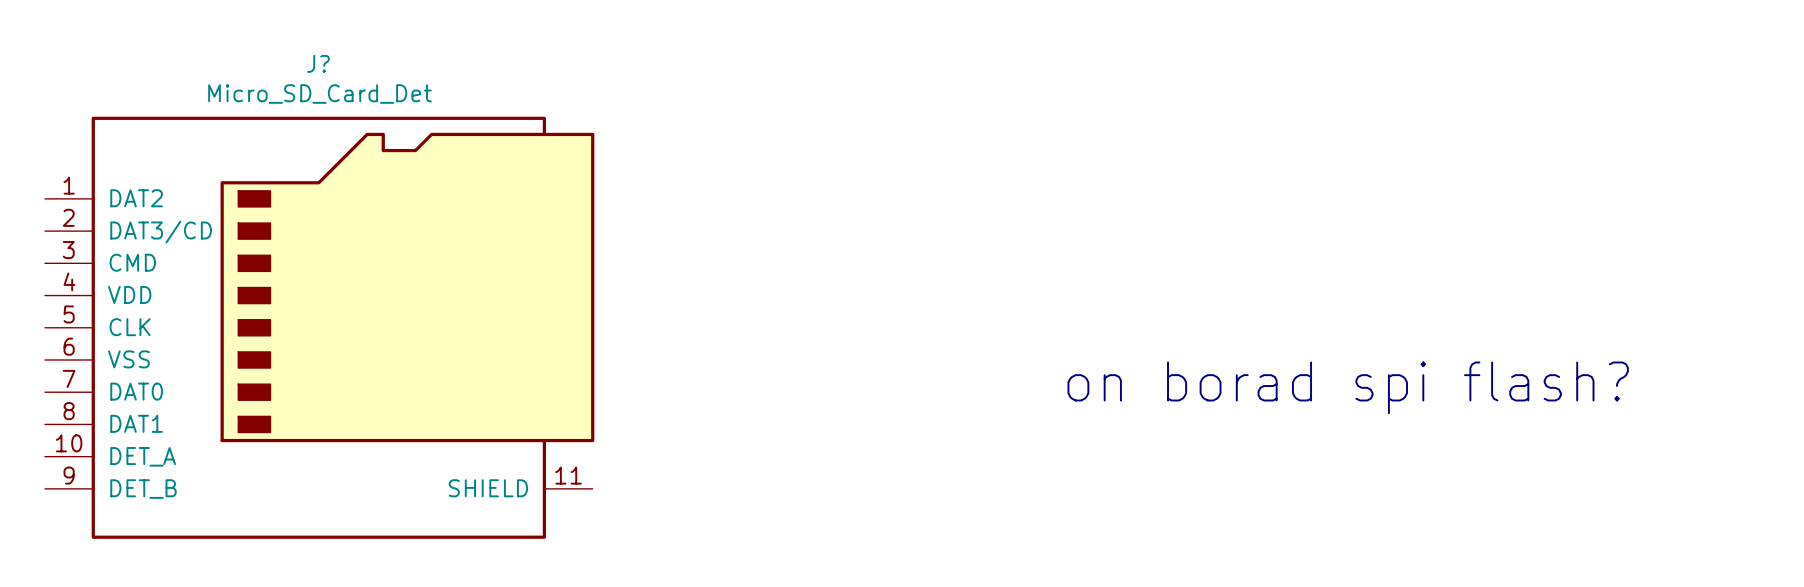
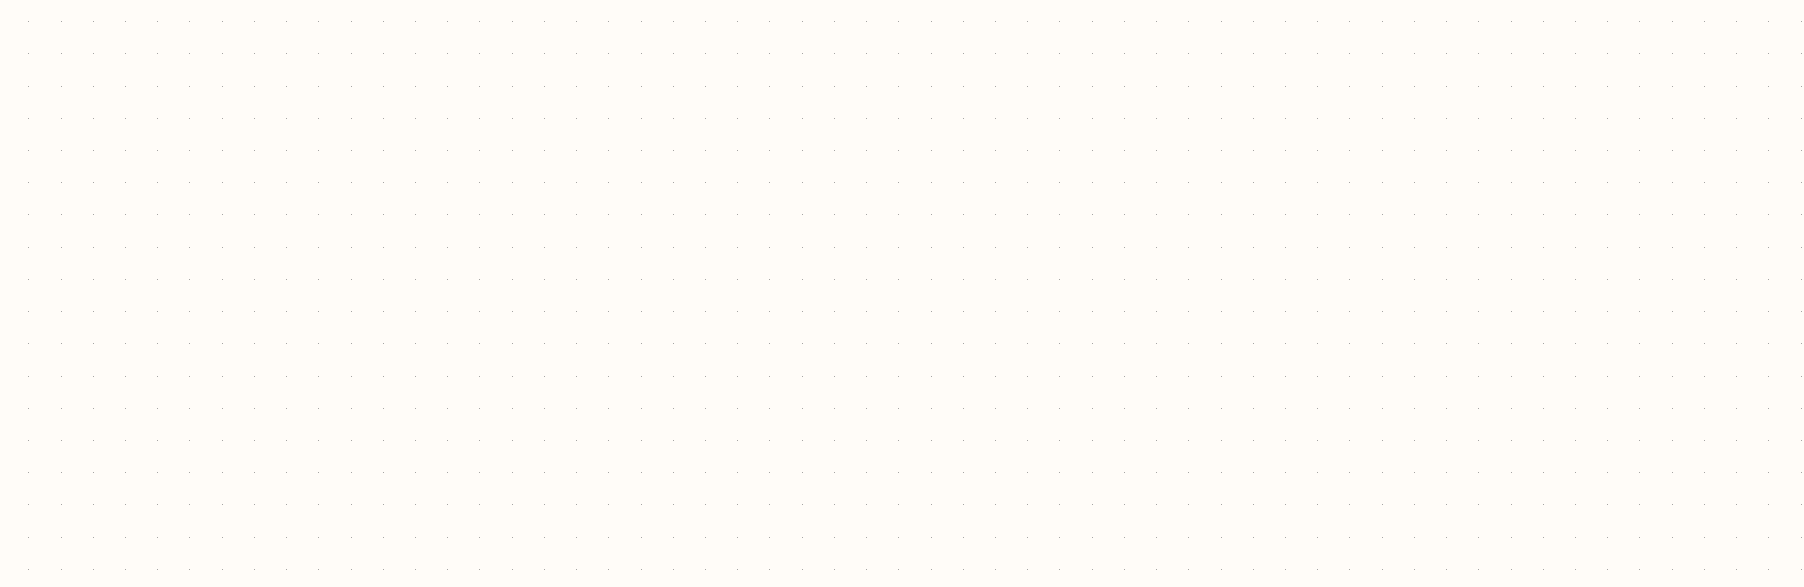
J?: Micro_SD_Card_Det (319, 327) -> none
text: on borad spi flash? (1348, 387) -> none

